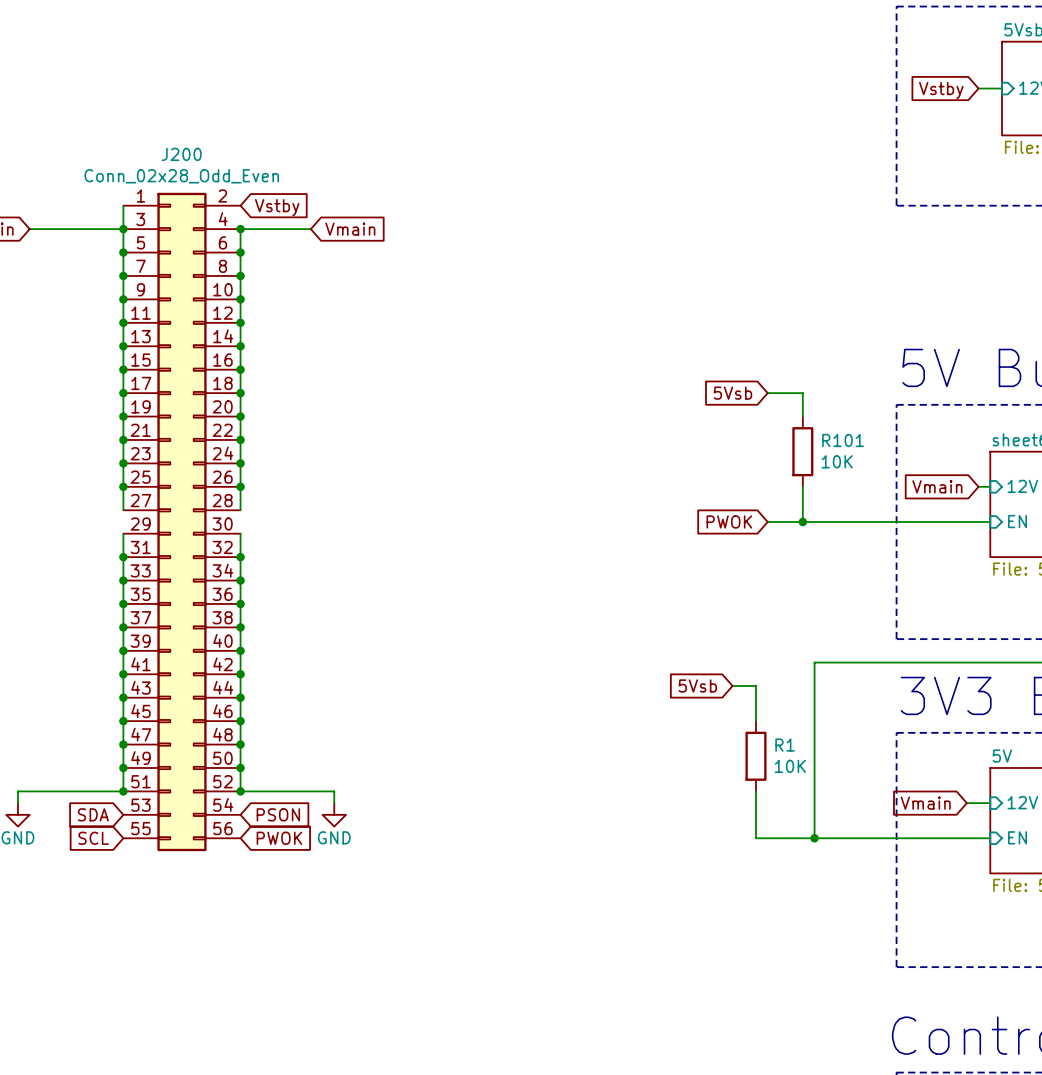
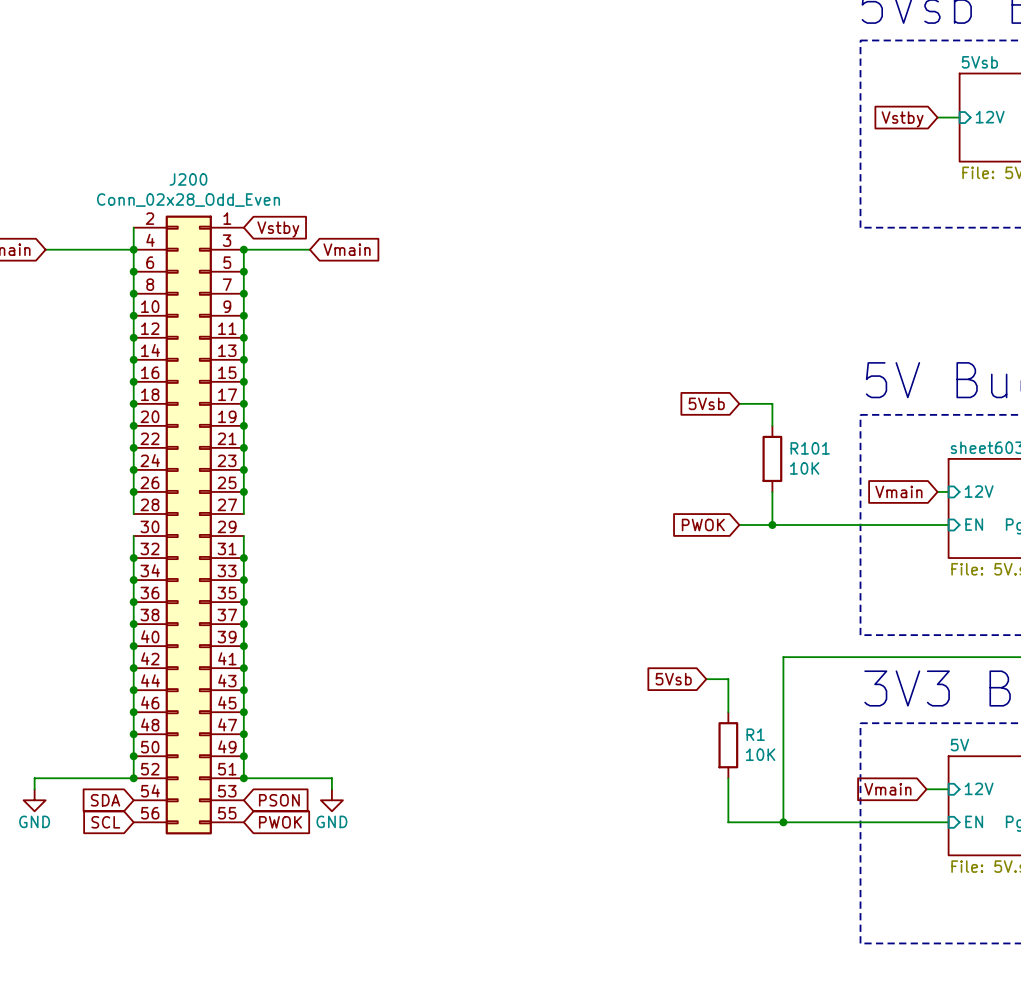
J200 flip: as is (181, 521) -> left-right (188, 524)

